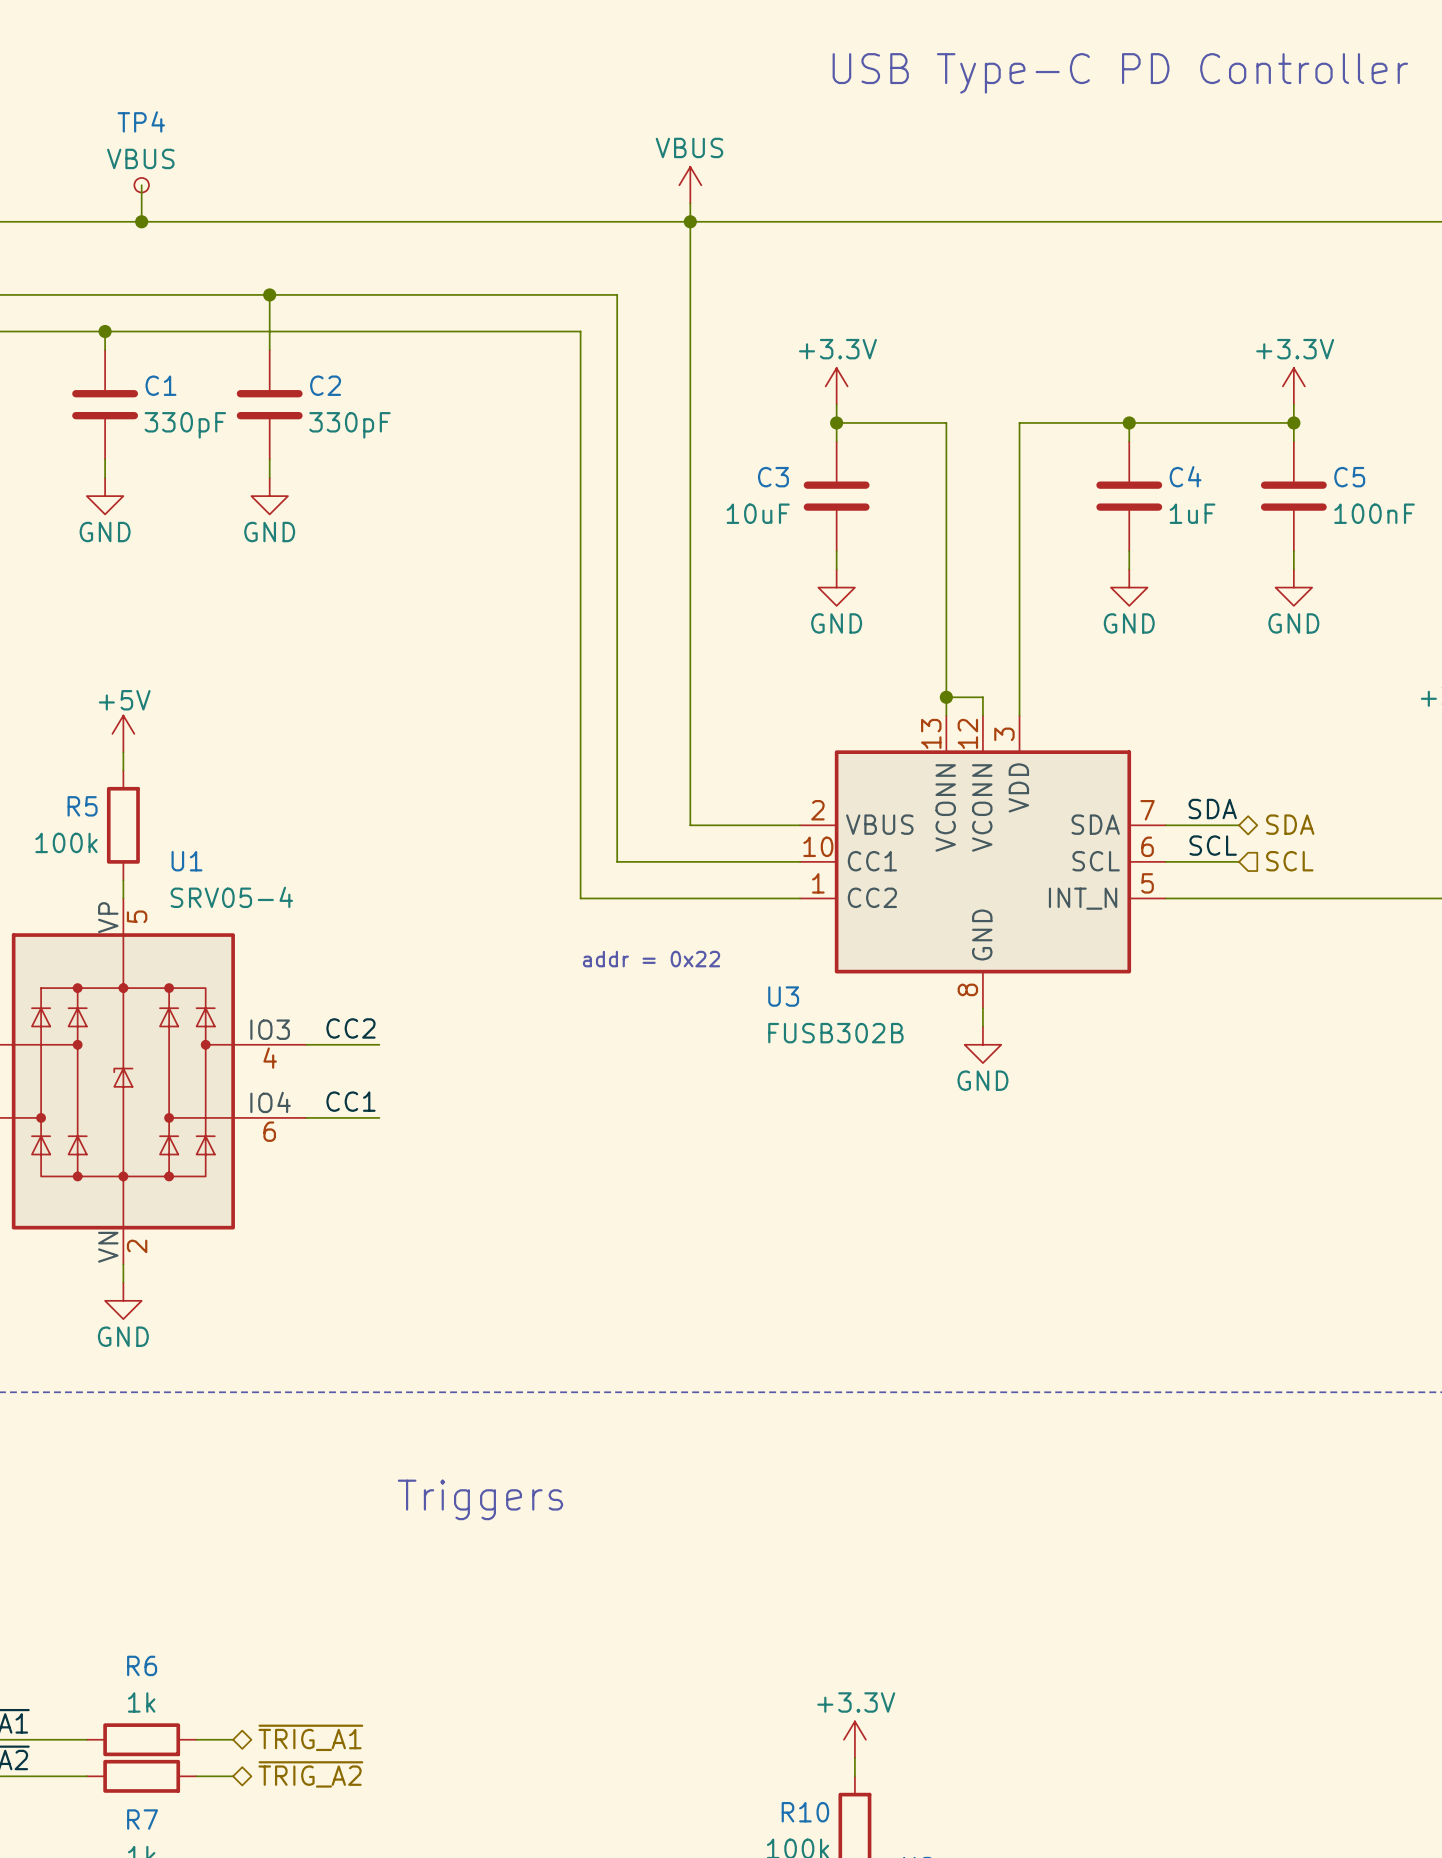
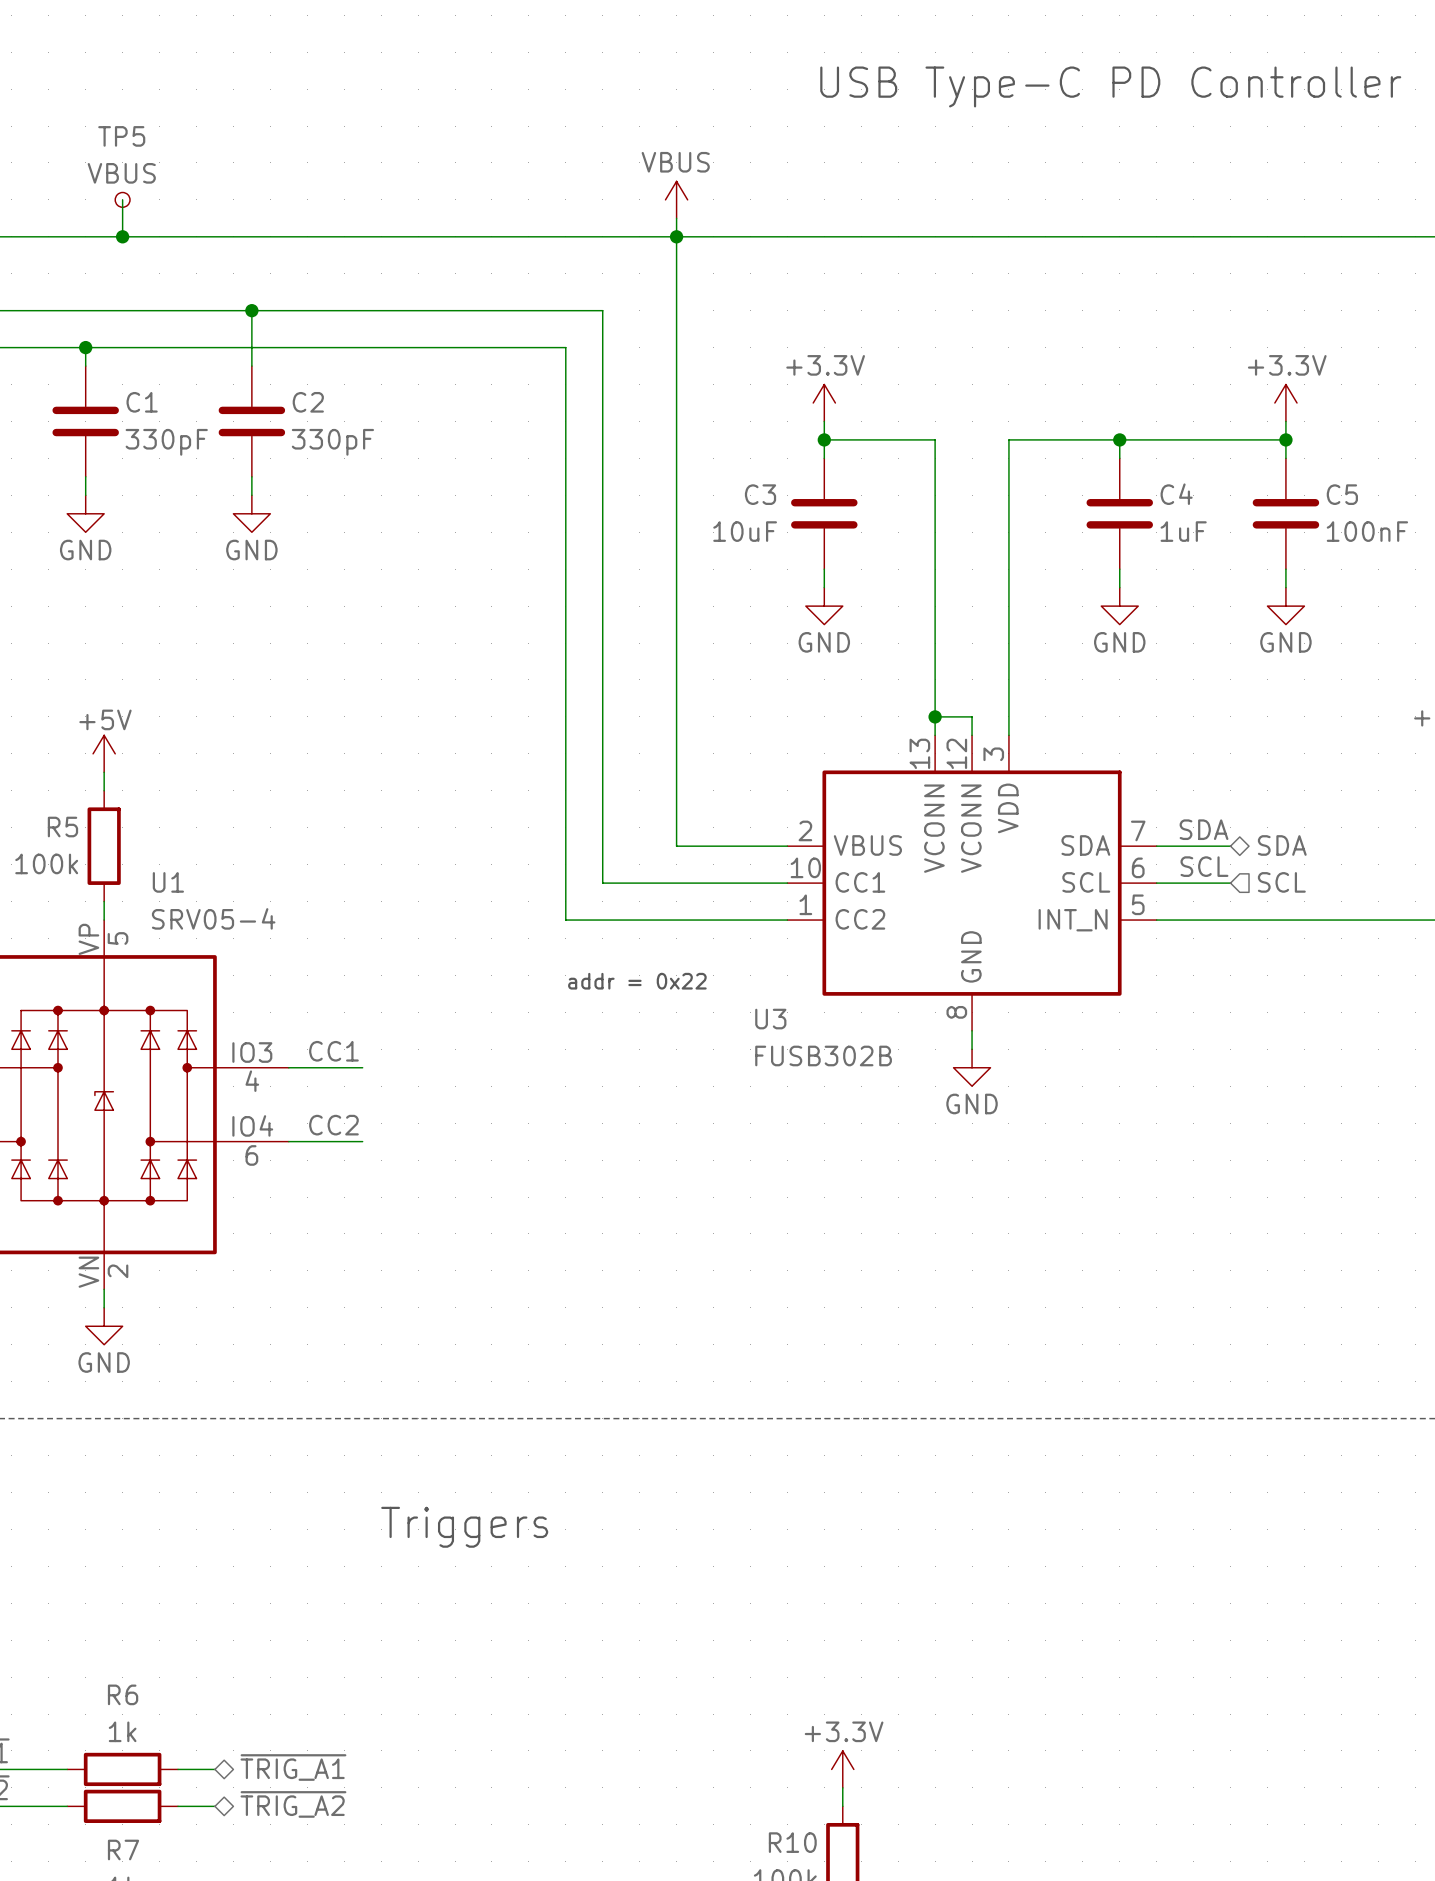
TP4 name: TP4 (141, 121) -> TP5 (121, 136)
label: CC2 (350, 1028) -> CC1 (333, 1051)
label: CC1 (350, 1101) -> CC2 (333, 1125)

